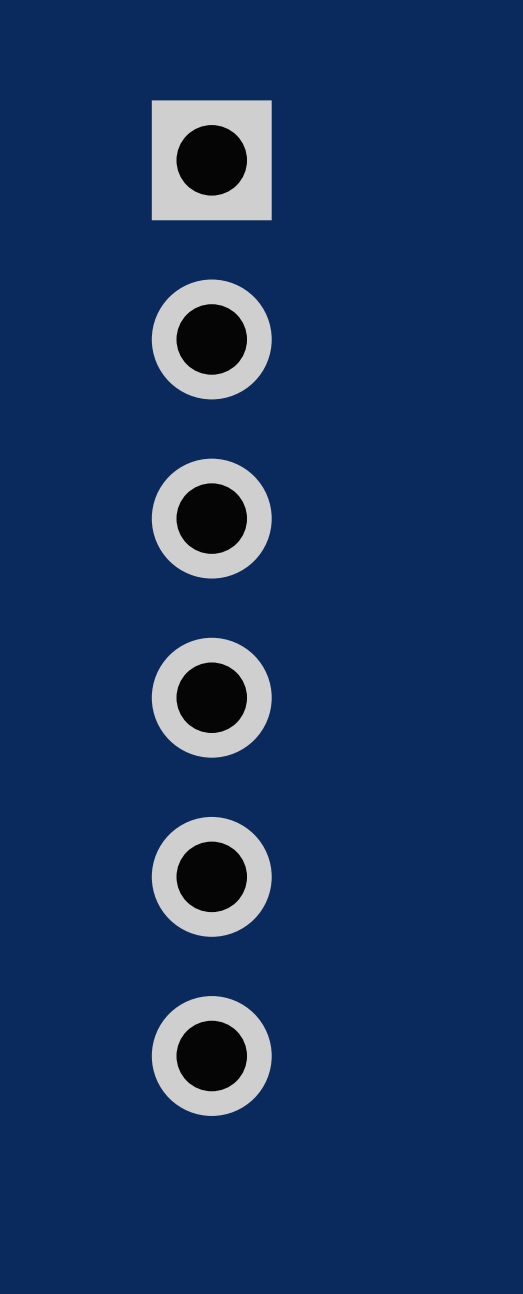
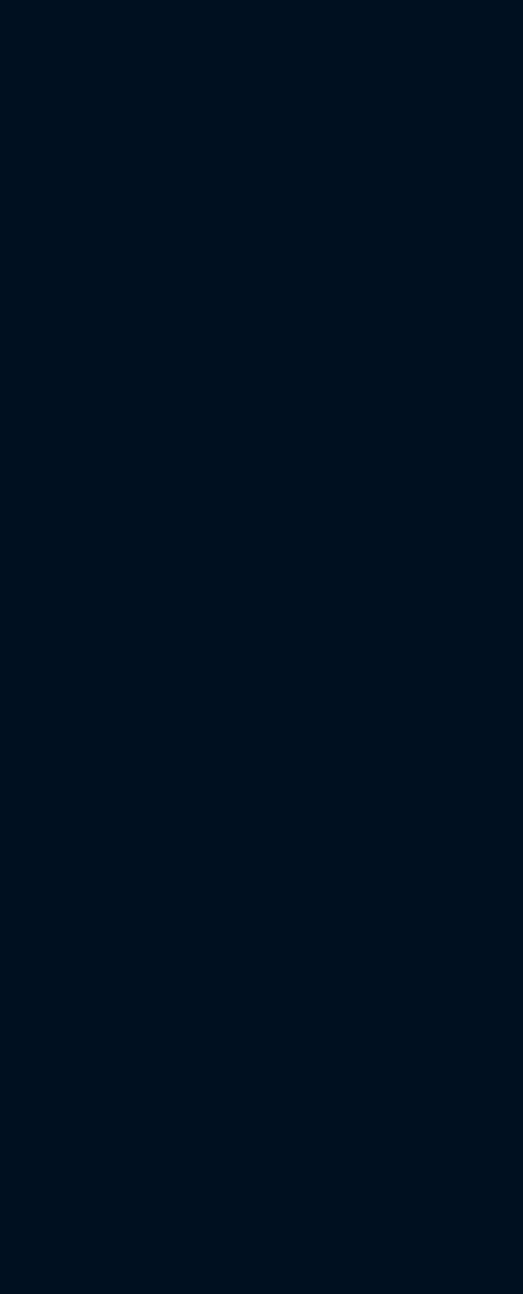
part: (211, 608) -> none

